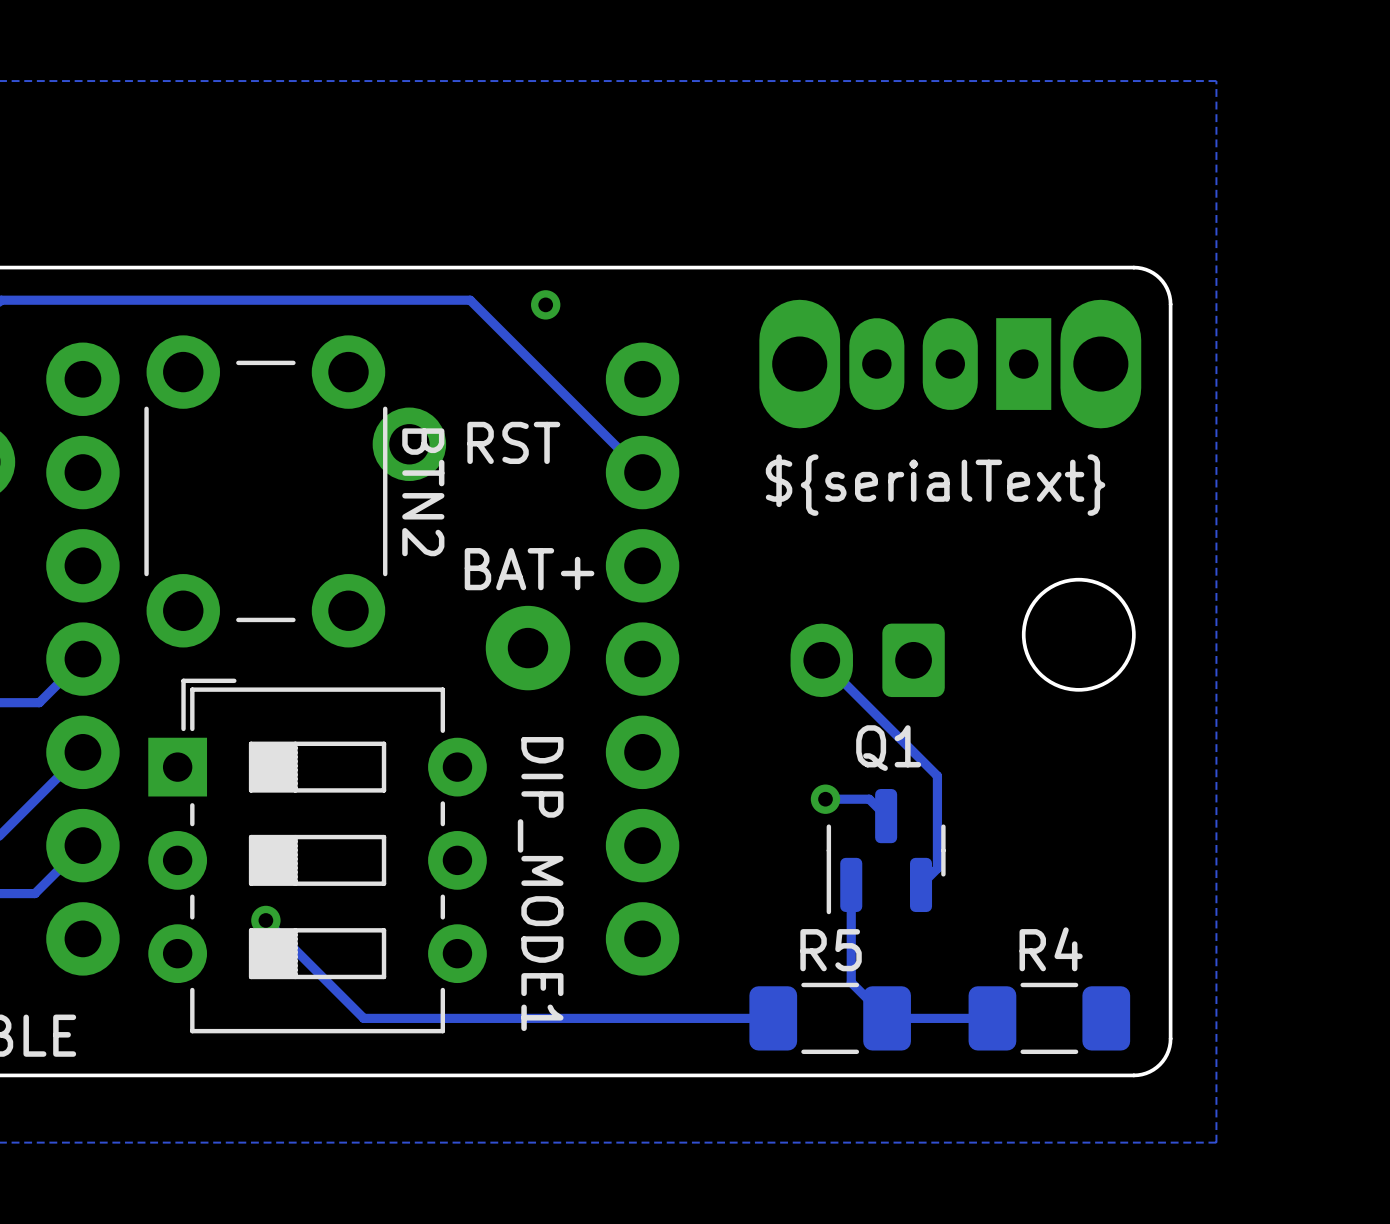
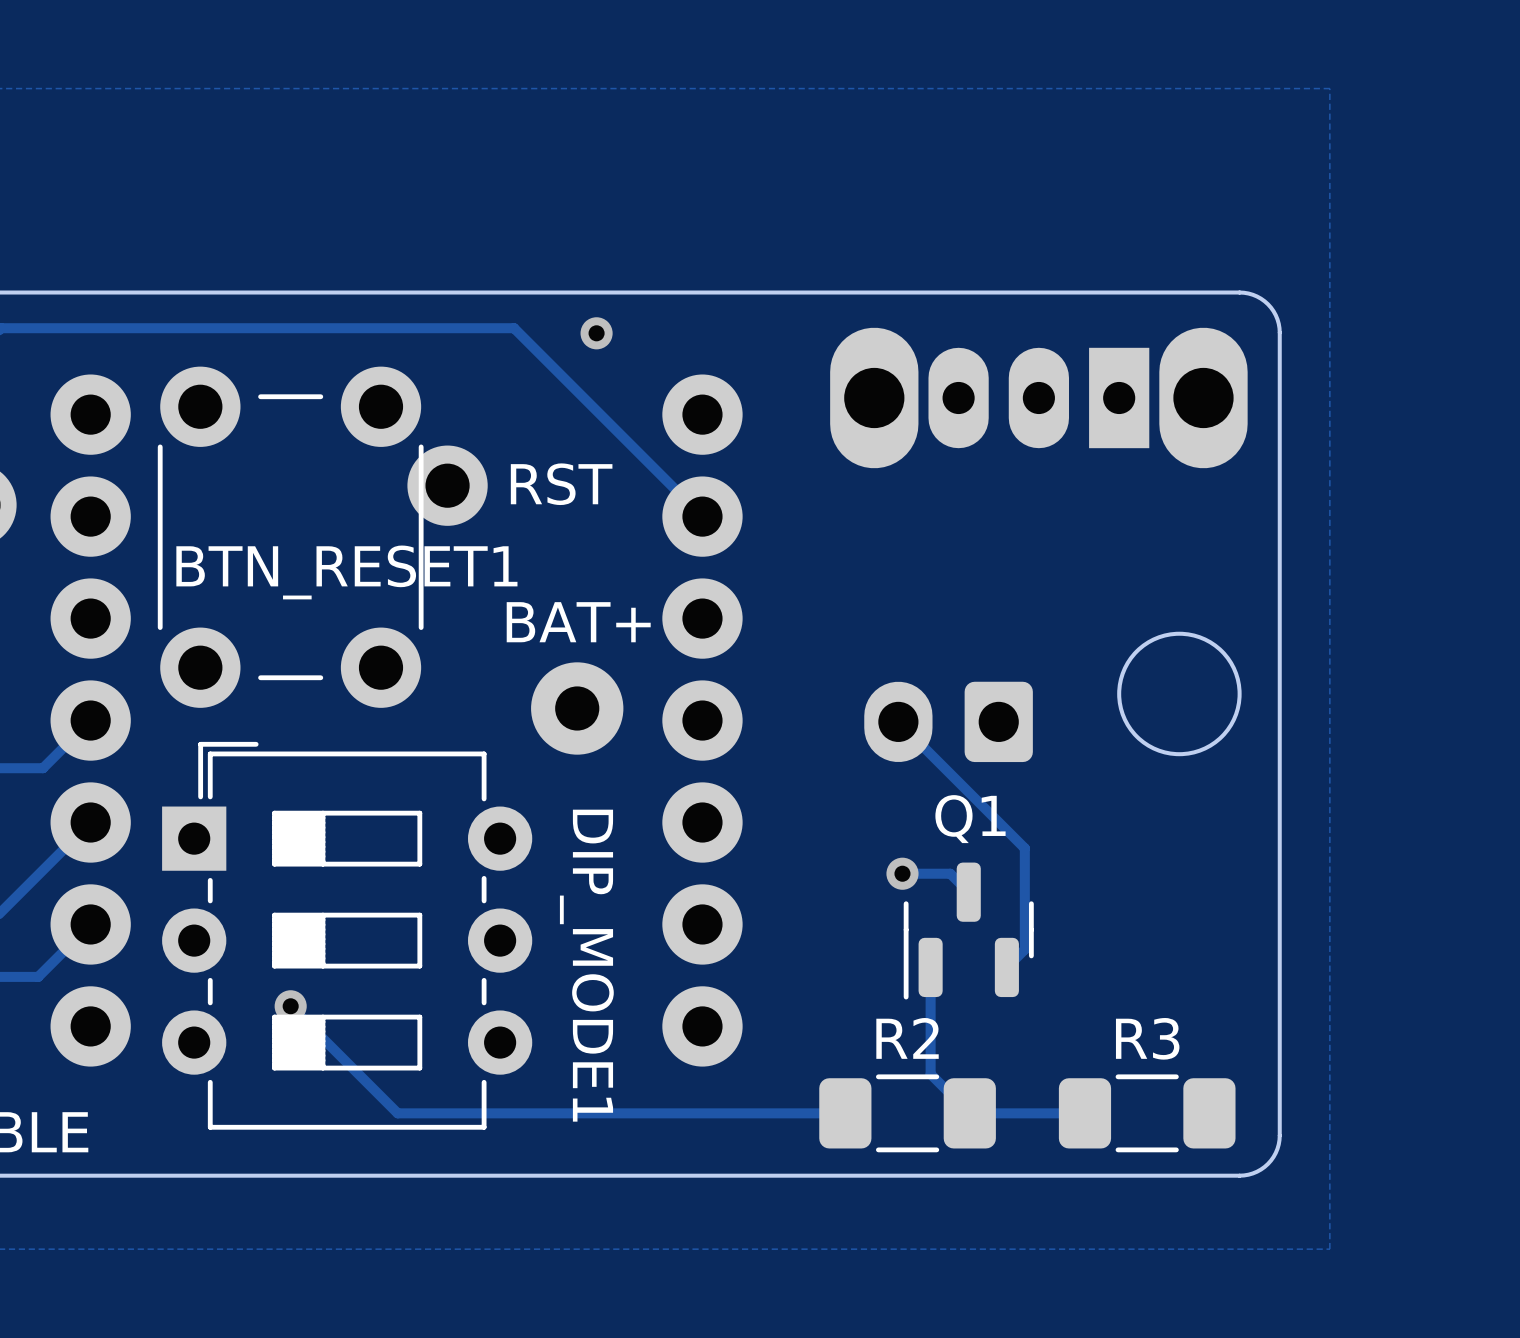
text: ${serialText} (935, 485) -> none
BTN2 name: BTN2 (423, 492) -> BTN_RESET1 (346, 572)
R4 name: R4 (1051, 949) -> R3 (1147, 1038)
R5 name: R5 (831, 950) -> R2 (907, 1038)

